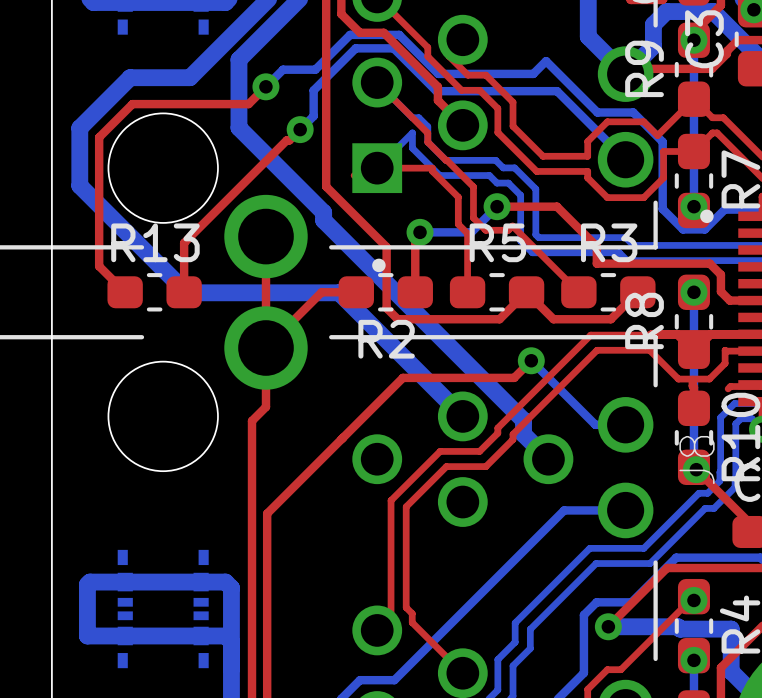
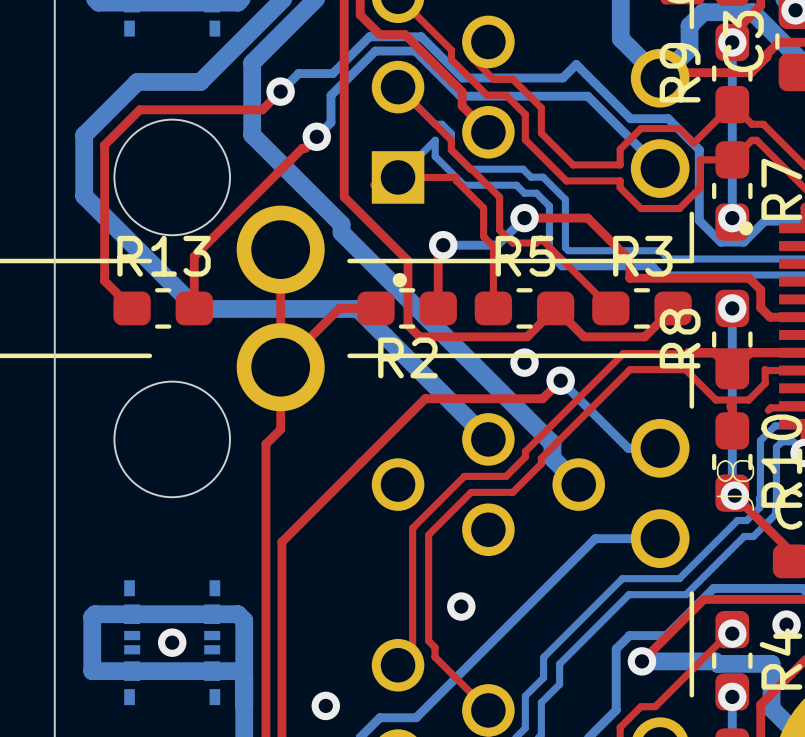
via: none -> (524, 362)
via: none -> (461, 606)
via: none -> (786, 624)
via: none -> (172, 642)
via: none -> (325, 705)

